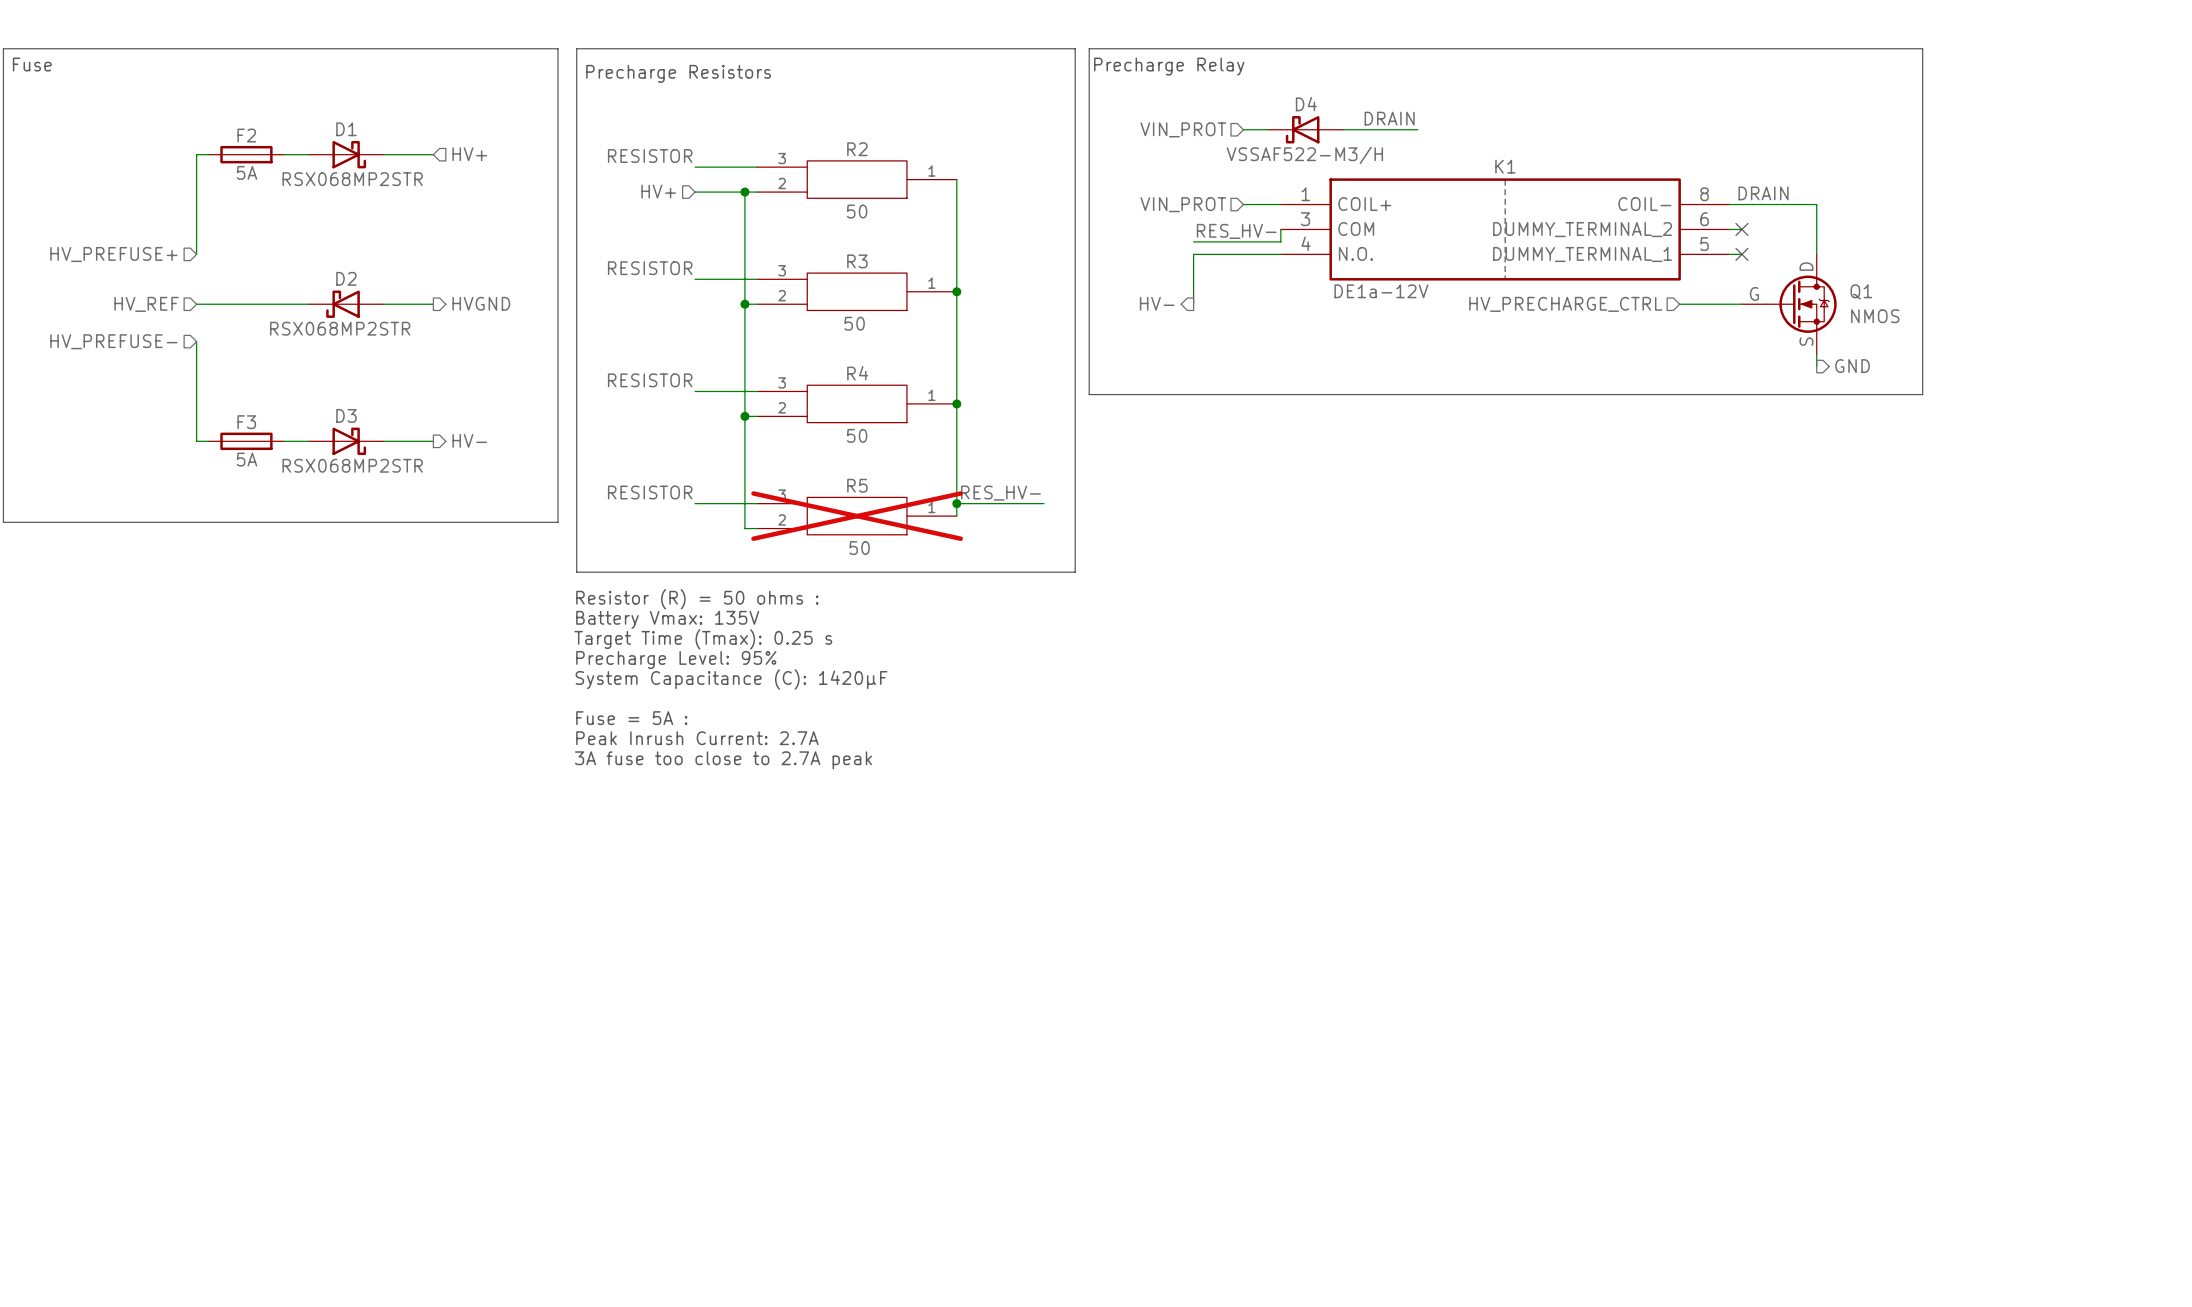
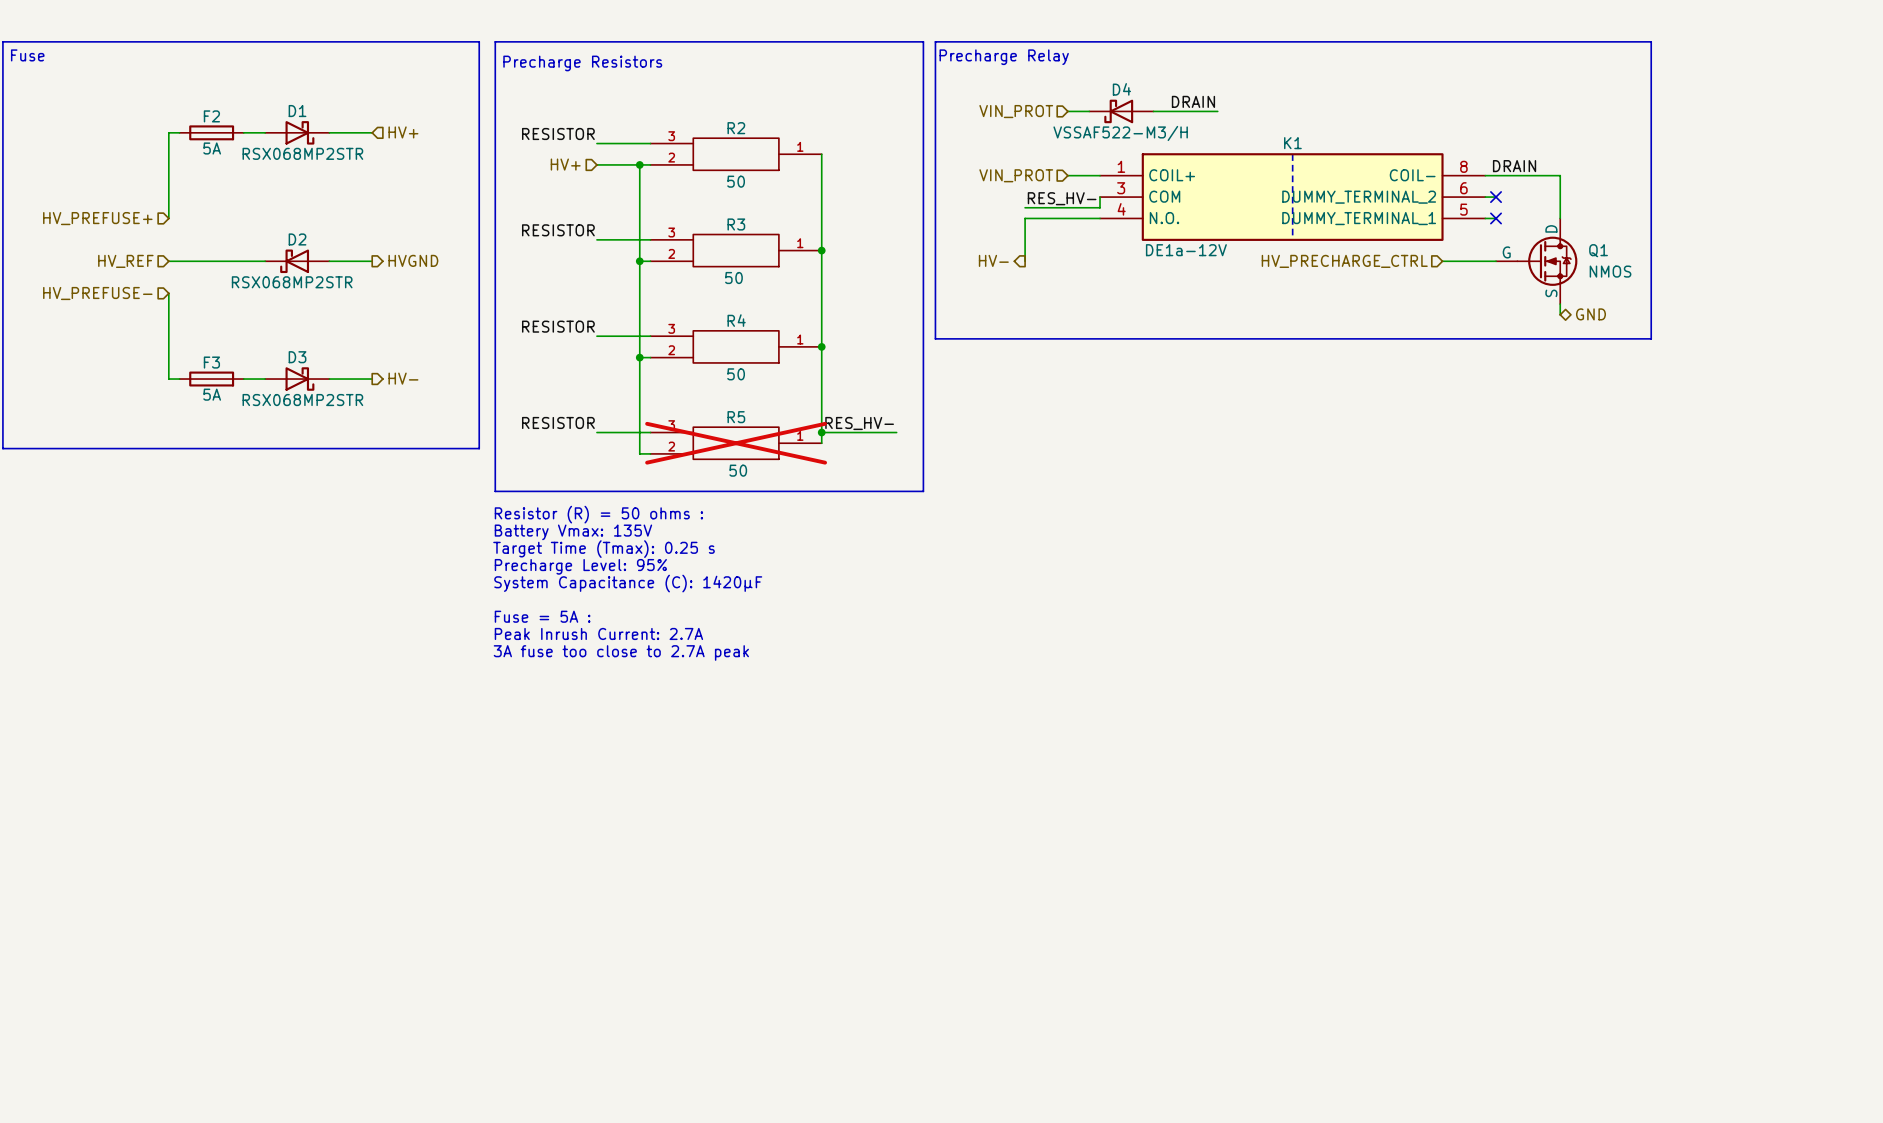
hierarchical label shape: output (1852, 366) -> bidirectional (1590, 314)

